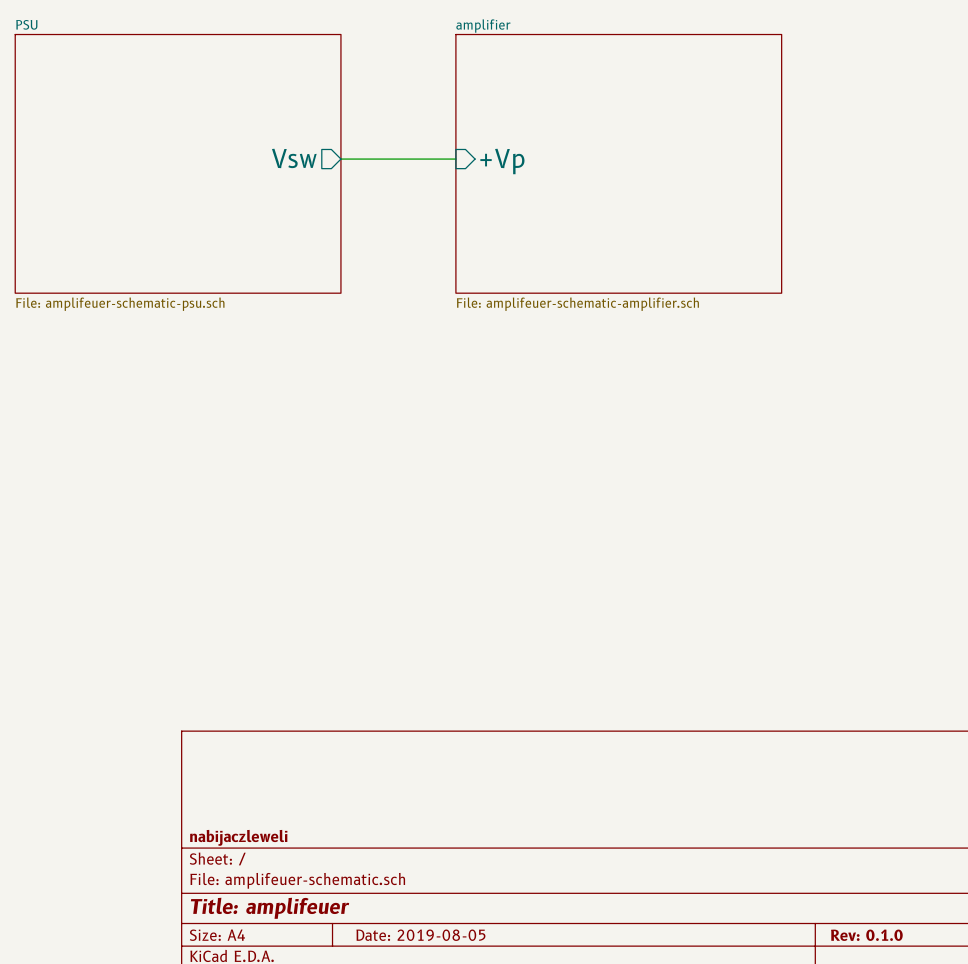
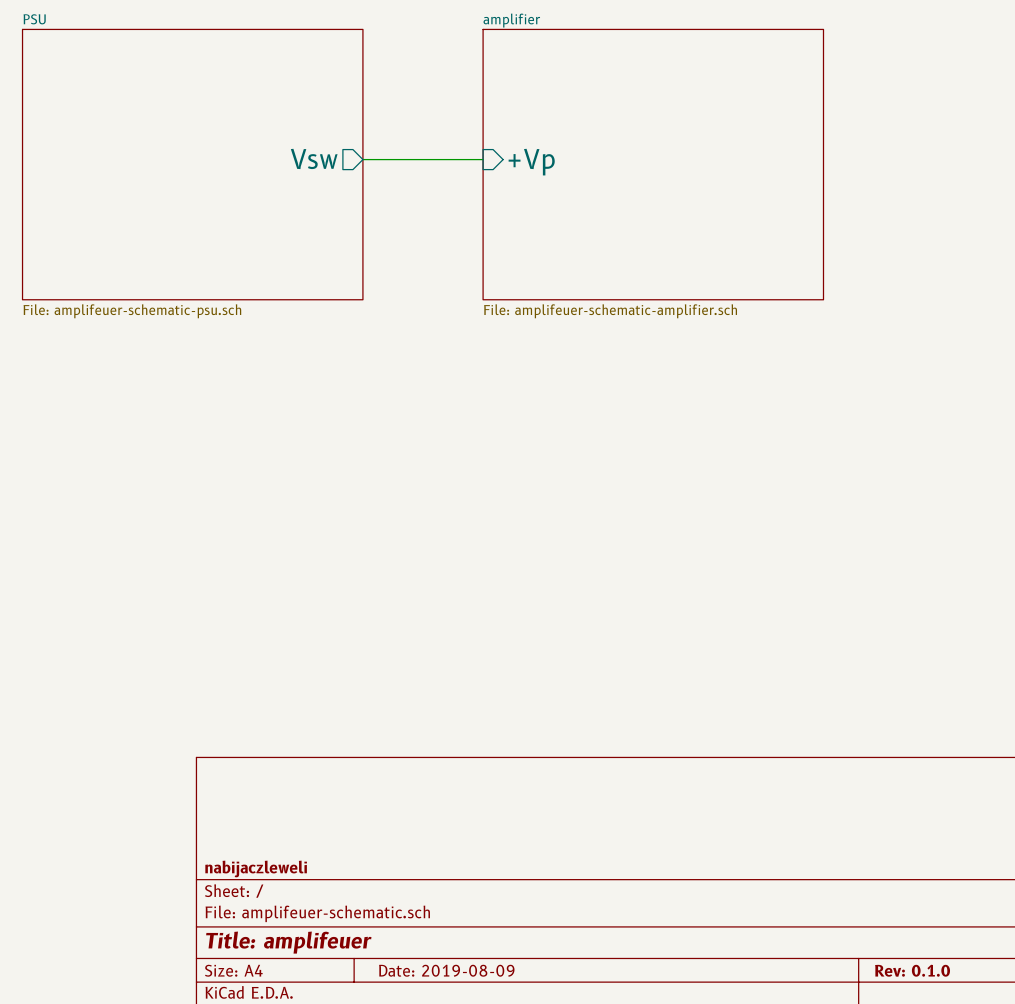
title block: Date: 2019-08-05 (420, 935) -> Date: 2019-08-09 (446, 970)

